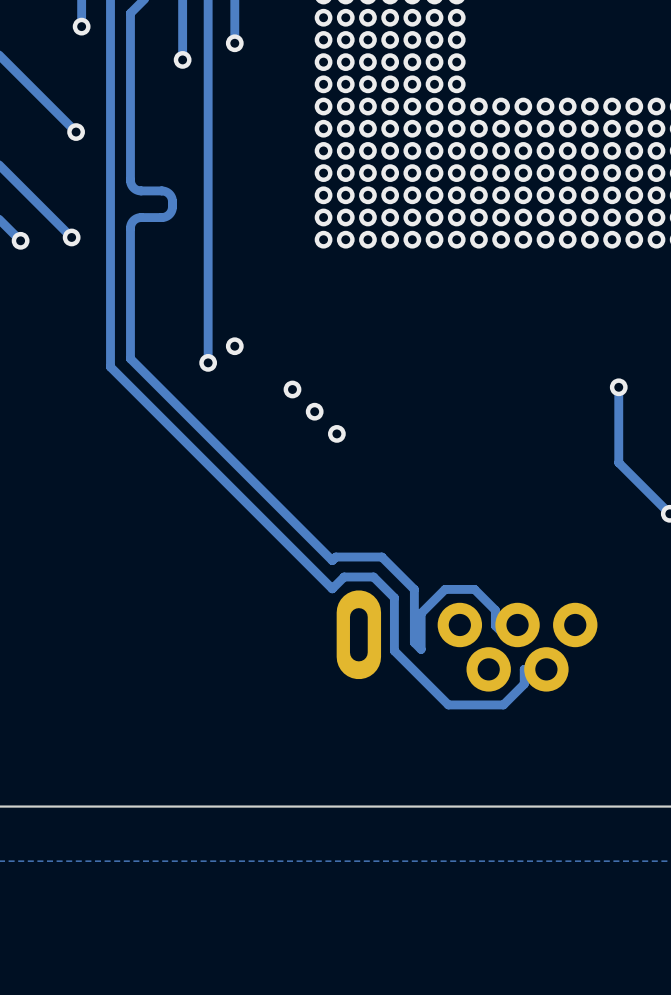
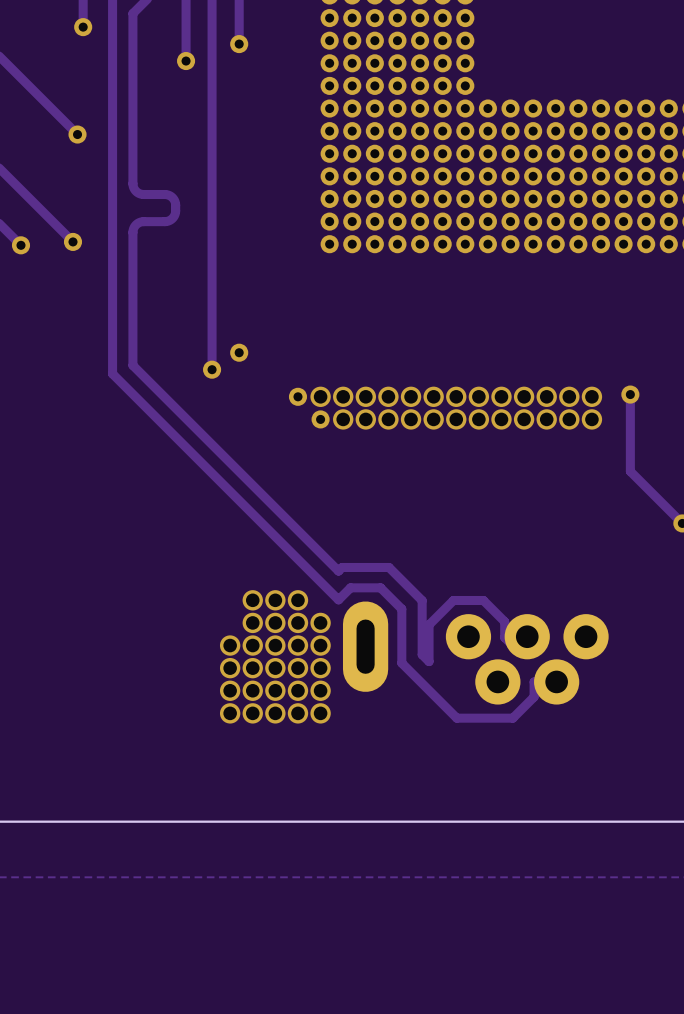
via: none -> (320, 396)
via: none -> (343, 396)
via: none -> (365, 396)
via: none -> (388, 396)
via: none -> (411, 396)
via: none -> (433, 396)
via: none -> (456, 396)
via: none -> (478, 396)
via: none -> (501, 396)
via: none -> (524, 396)
via: none -> (546, 396)
via: none -> (569, 396)
via: none -> (591, 396)
via: none -> (343, 419)
via: none -> (365, 419)
via: none -> (388, 419)
via: none -> (411, 419)
via: none -> (433, 419)
via: none -> (456, 419)
via: none -> (478, 419)
via: none -> (501, 419)
via: none -> (524, 419)
via: none -> (546, 419)
via: none -> (569, 419)
via: none -> (591, 419)
via: (336, 433) -> none
via: none -> (252, 600)
via: none -> (275, 600)
via: none -> (297, 600)
via: none -> (252, 622)
via: none -> (275, 622)
via: none -> (297, 622)
via: none -> (320, 622)
via: none -> (230, 645)
via: none -> (252, 645)
via: none -> (275, 645)
via: none -> (297, 645)
via: none -> (320, 645)
via: none -> (230, 668)
via: none -> (252, 668)
via: none -> (275, 668)
via: none -> (297, 668)
via: none -> (320, 668)
via: none -> (230, 690)
via: none -> (252, 690)
via: none -> (275, 690)
via: none -> (297, 690)
via: none -> (320, 690)
via: none -> (230, 713)
via: none -> (252, 713)
via: none -> (275, 713)
via: none -> (297, 713)
via: none -> (320, 713)

